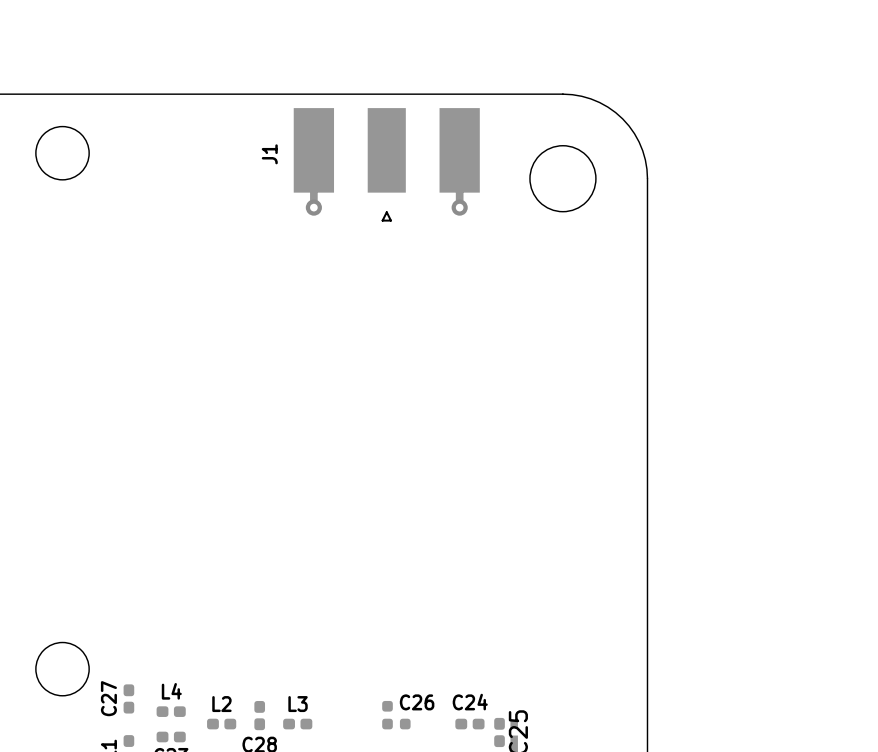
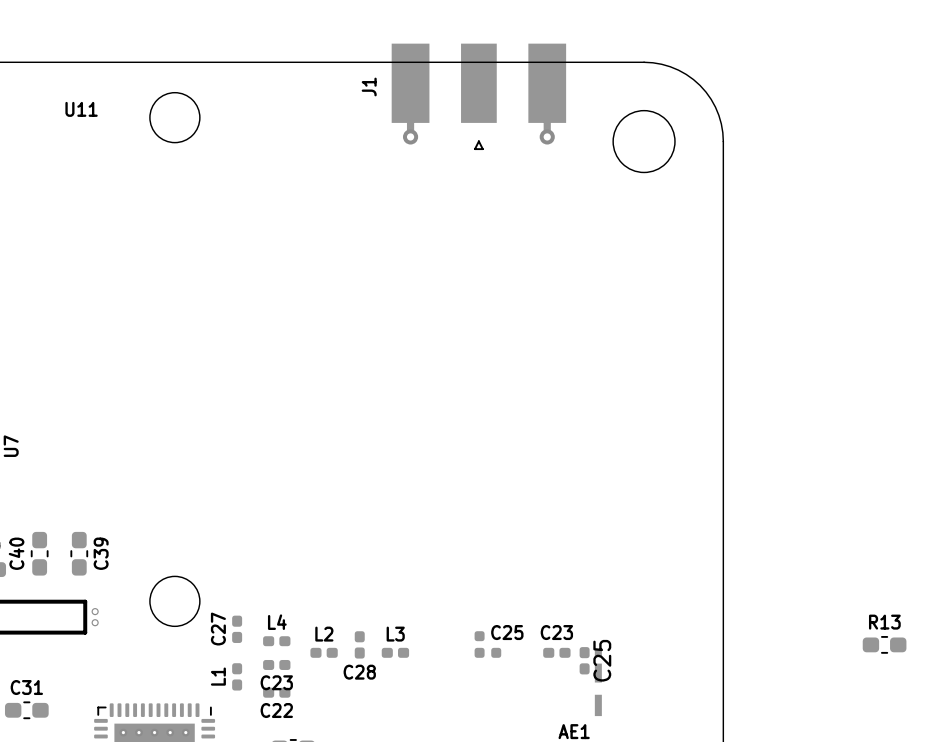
J1 position: (386, 164) -> (478, 96)
C26 name: C26 (417, 702) -> C25 (507, 632)
C24 name: C24 (470, 702) -> C23 (556, 632)
R13: none -> (884, 644)

